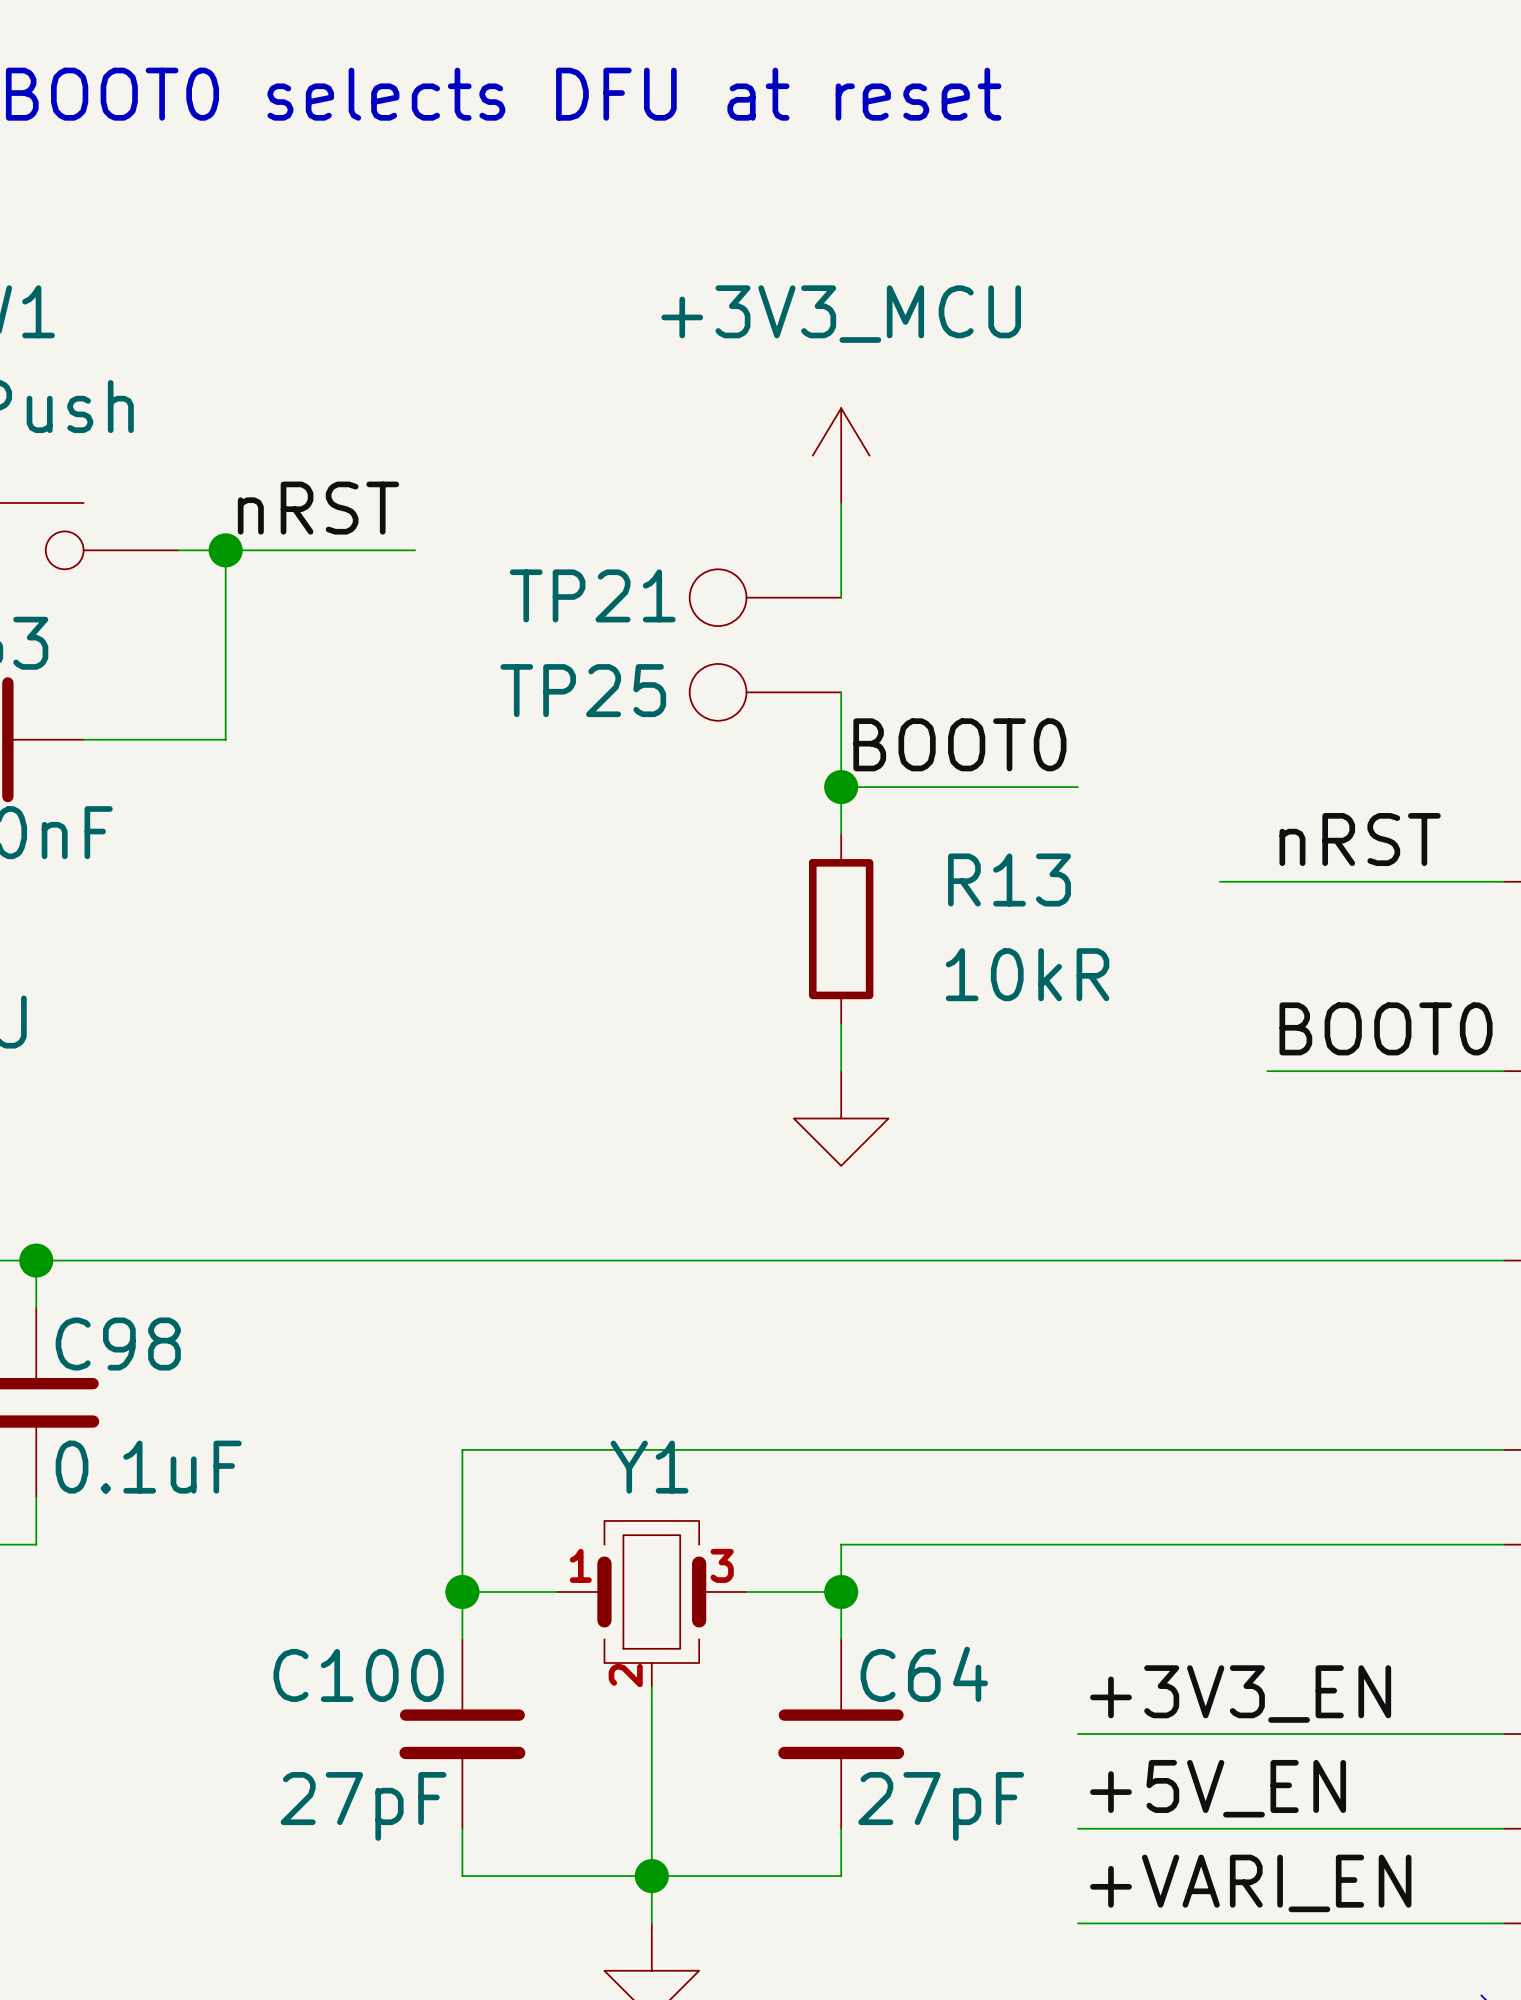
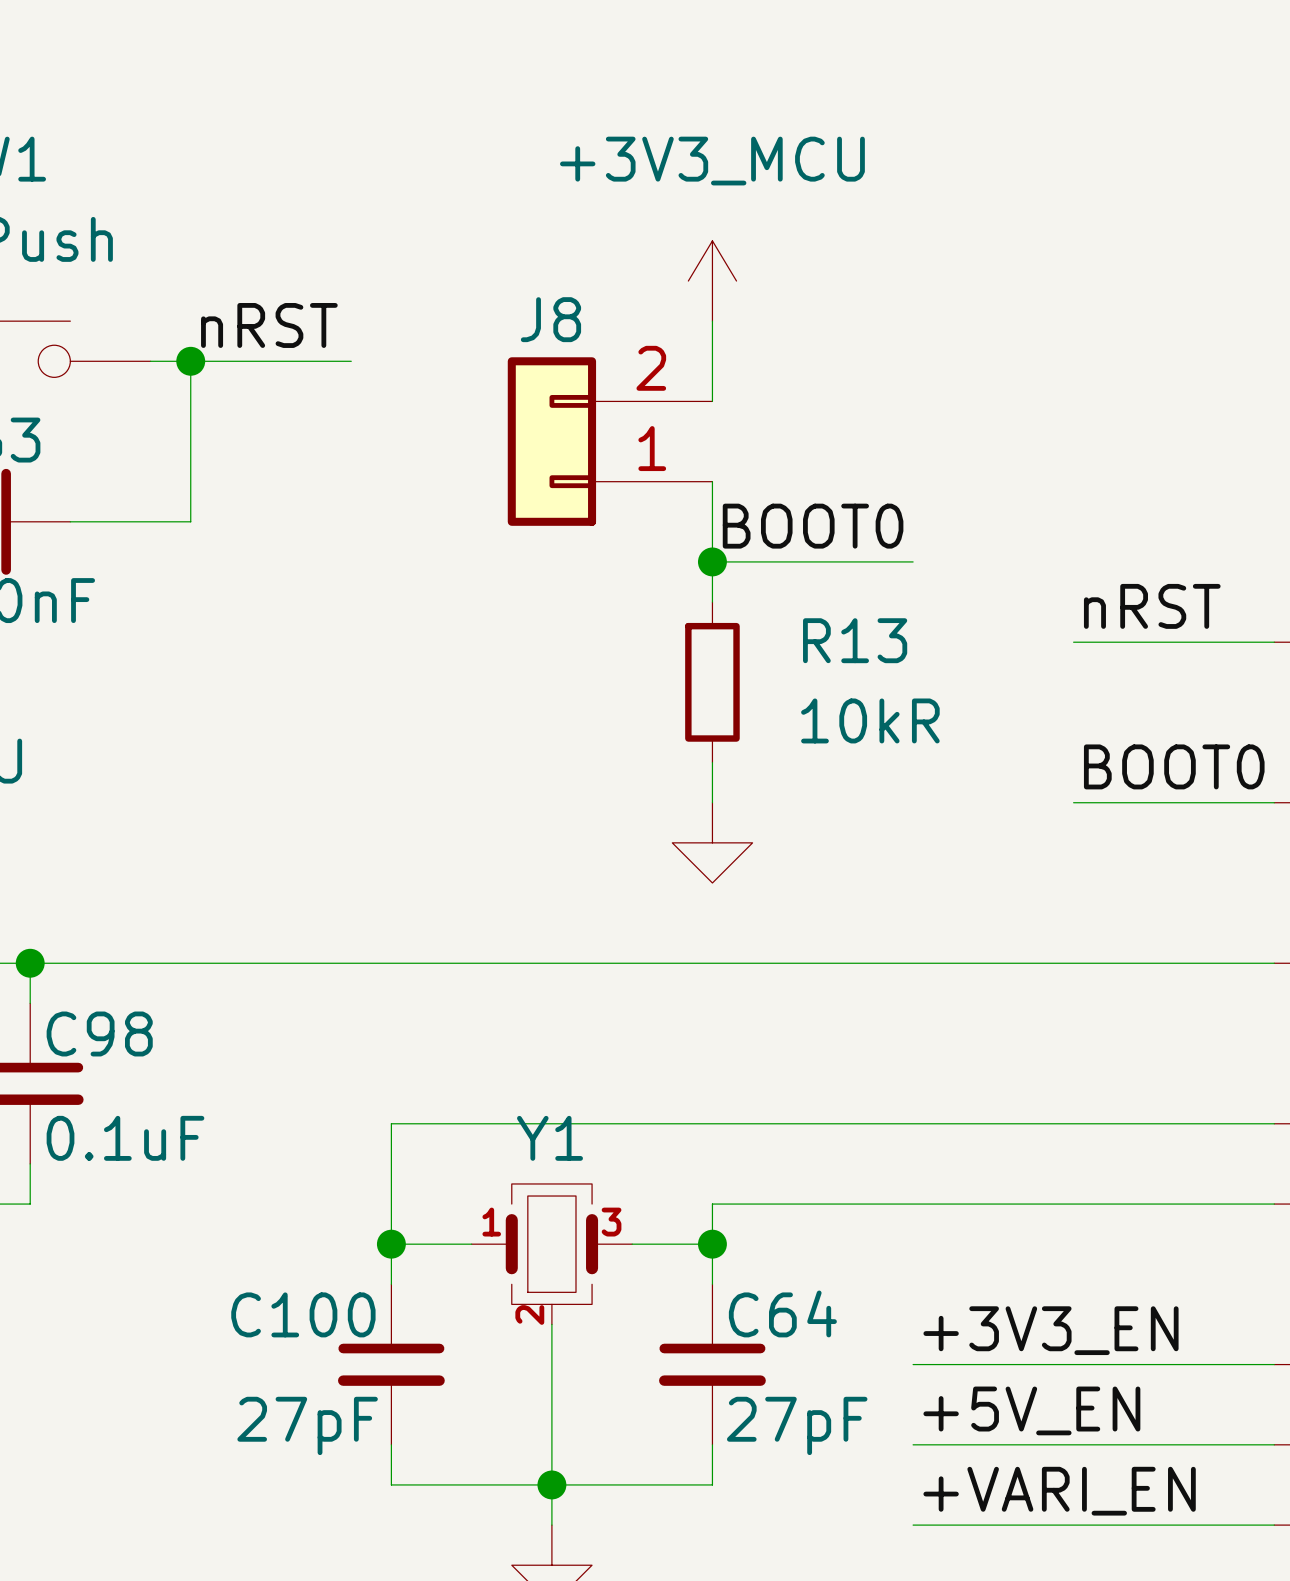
TP21: (765, 597) -> none
J8: none -> (610, 441)
TP25: (765, 692) -> none
wire: (1219, 881) (1267, 881) -> none

